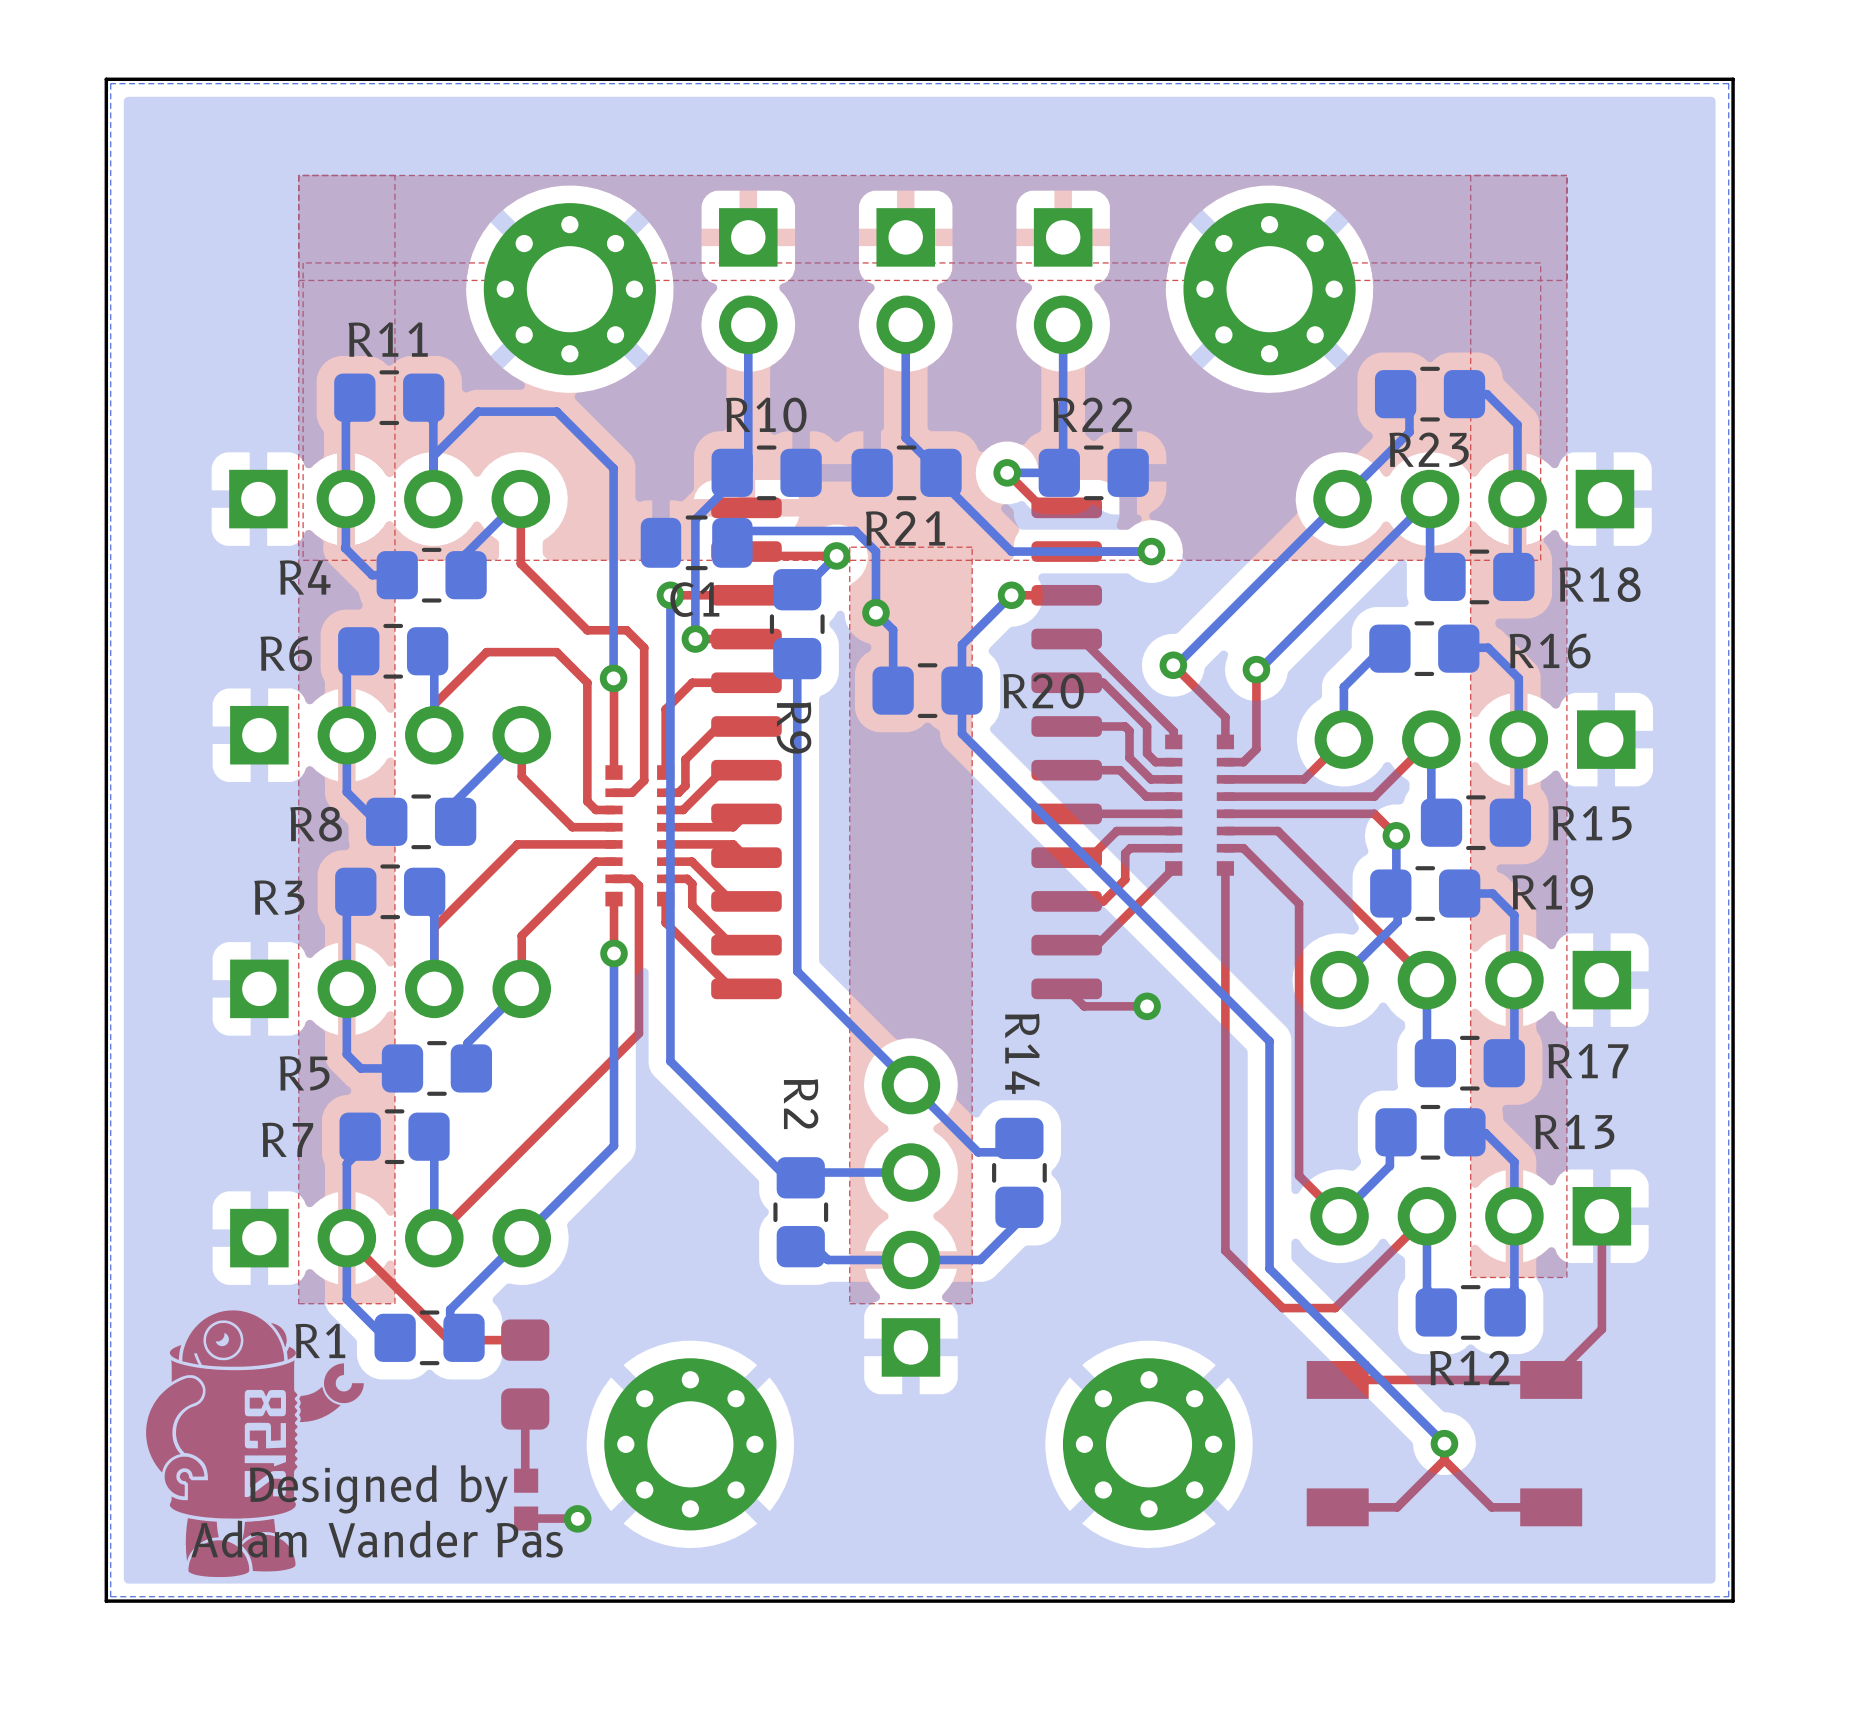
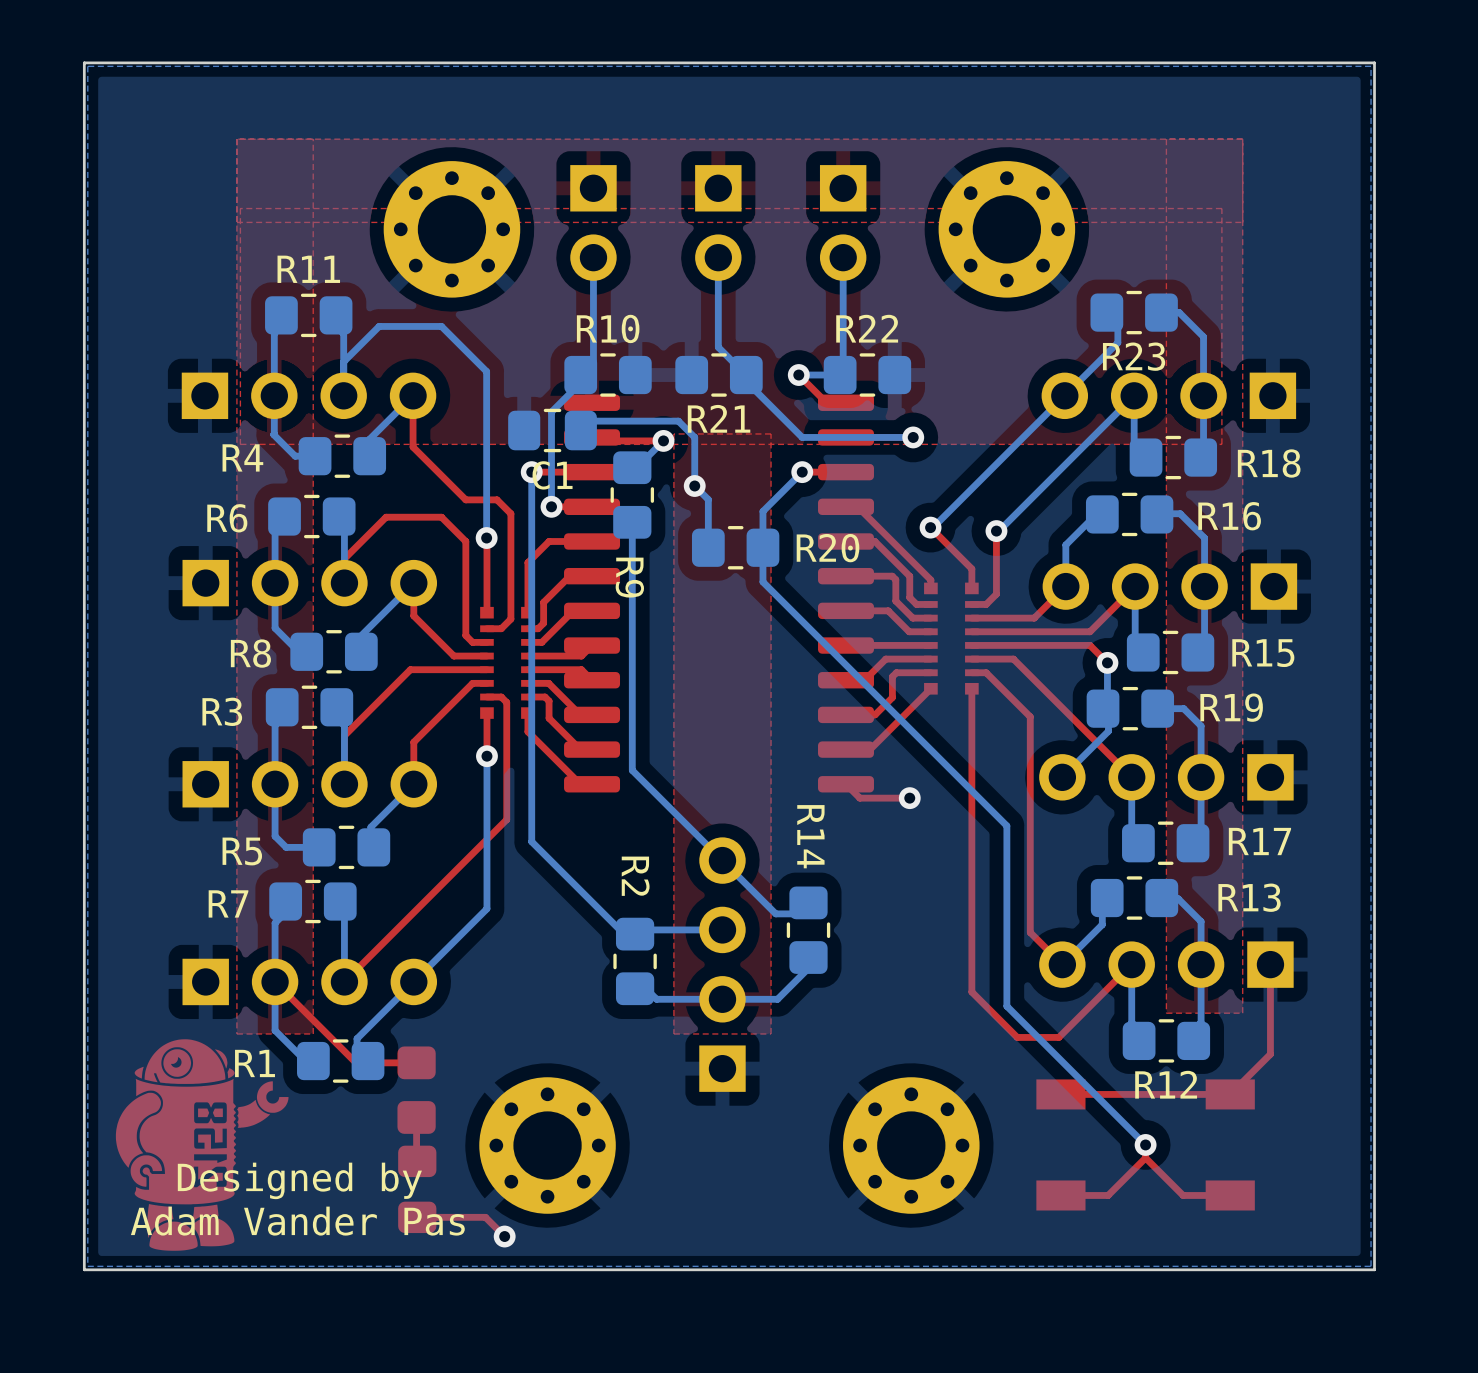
part footprint: [514, 1468, 539, 1531] -> [398, 1145, 437, 1234]
top track: (577, 1518) (526, 1518) -> none
via position: (577, 1518) -> (504, 1236)
top track: none -> (417, 1217) (485, 1217) (504, 1236)

